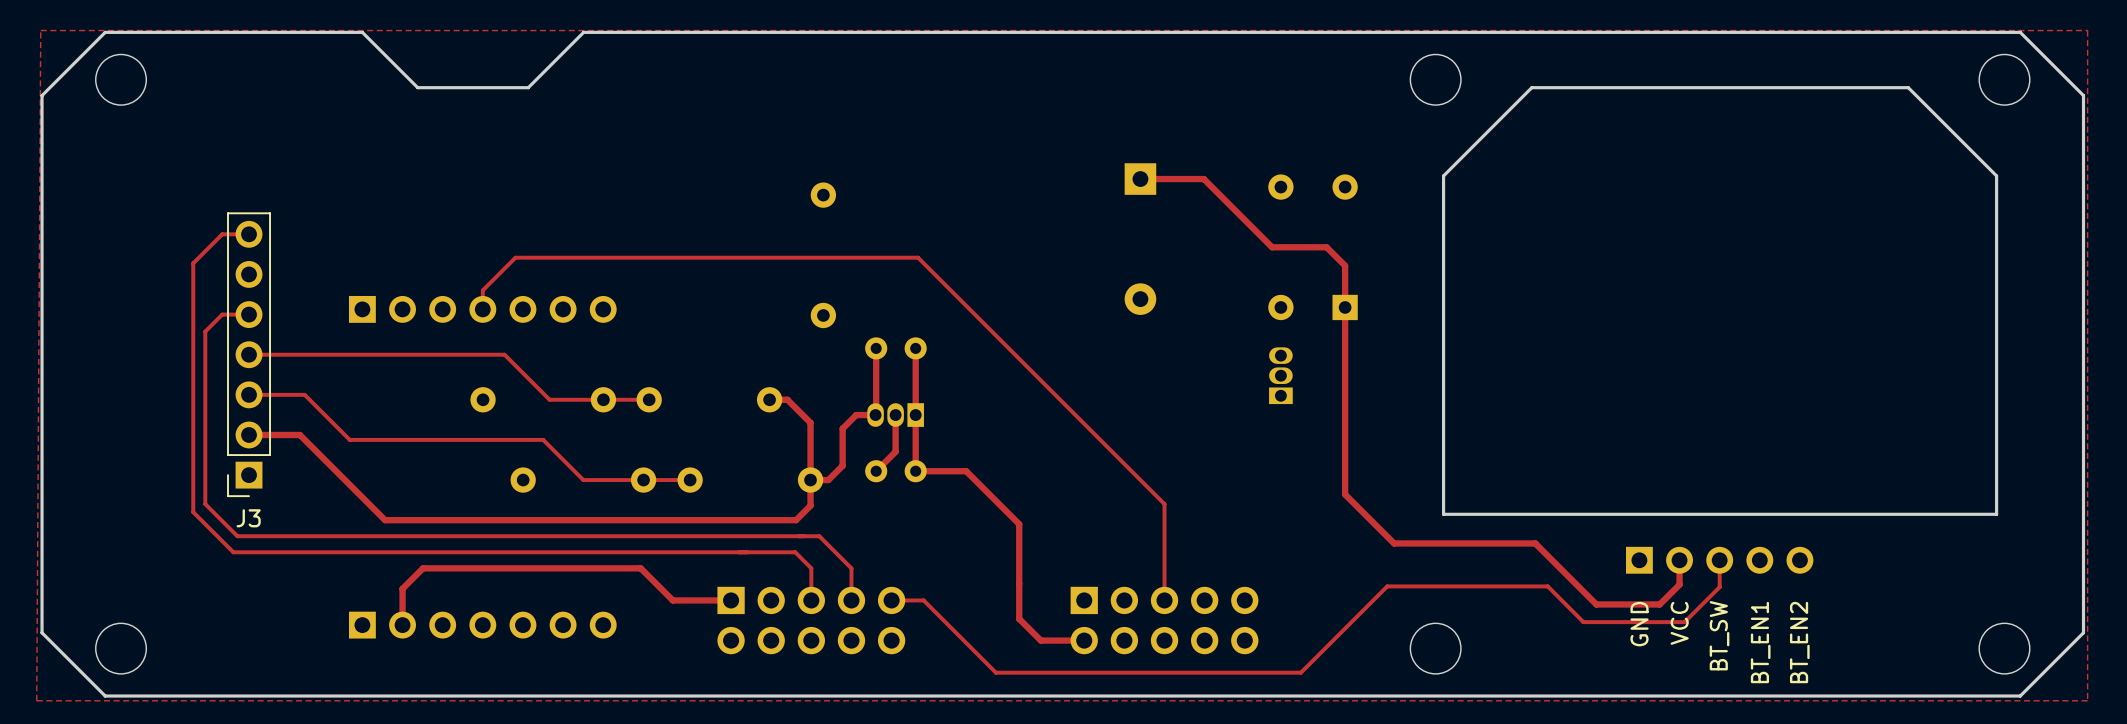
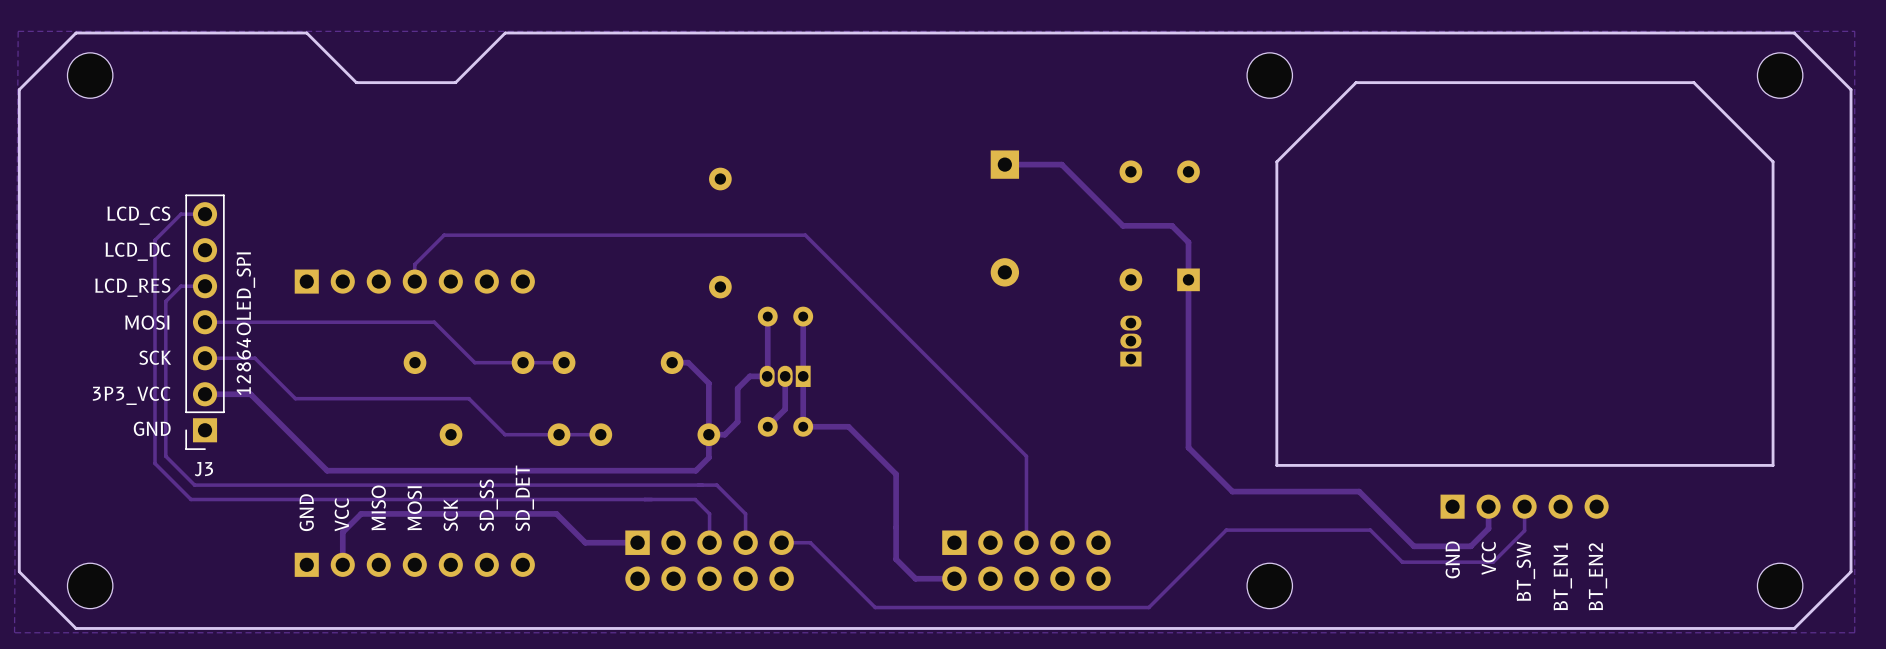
text: none -> LCD_CS (138, 215)
text: none -> LCD_DC (138, 251)
text: none -> LCD_RES (132, 287)
text: none -> MOSI (147, 322)
J3 value: none -> 12864OLED_SPI (245, 323)
text: none -> SCK (155, 357)
text: none -> 3P3_VCC (131, 395)
text: none -> GND (152, 428)
text: none -> SD_DET (524, 498)
text: none -> SD_SS (488, 505)
text: none -> MISO (378, 507)
text: none -> MOSI (414, 508)
text: none -> GND (306, 512)
text: none -> SCK (450, 515)
text: none -> VCC (341, 514)

